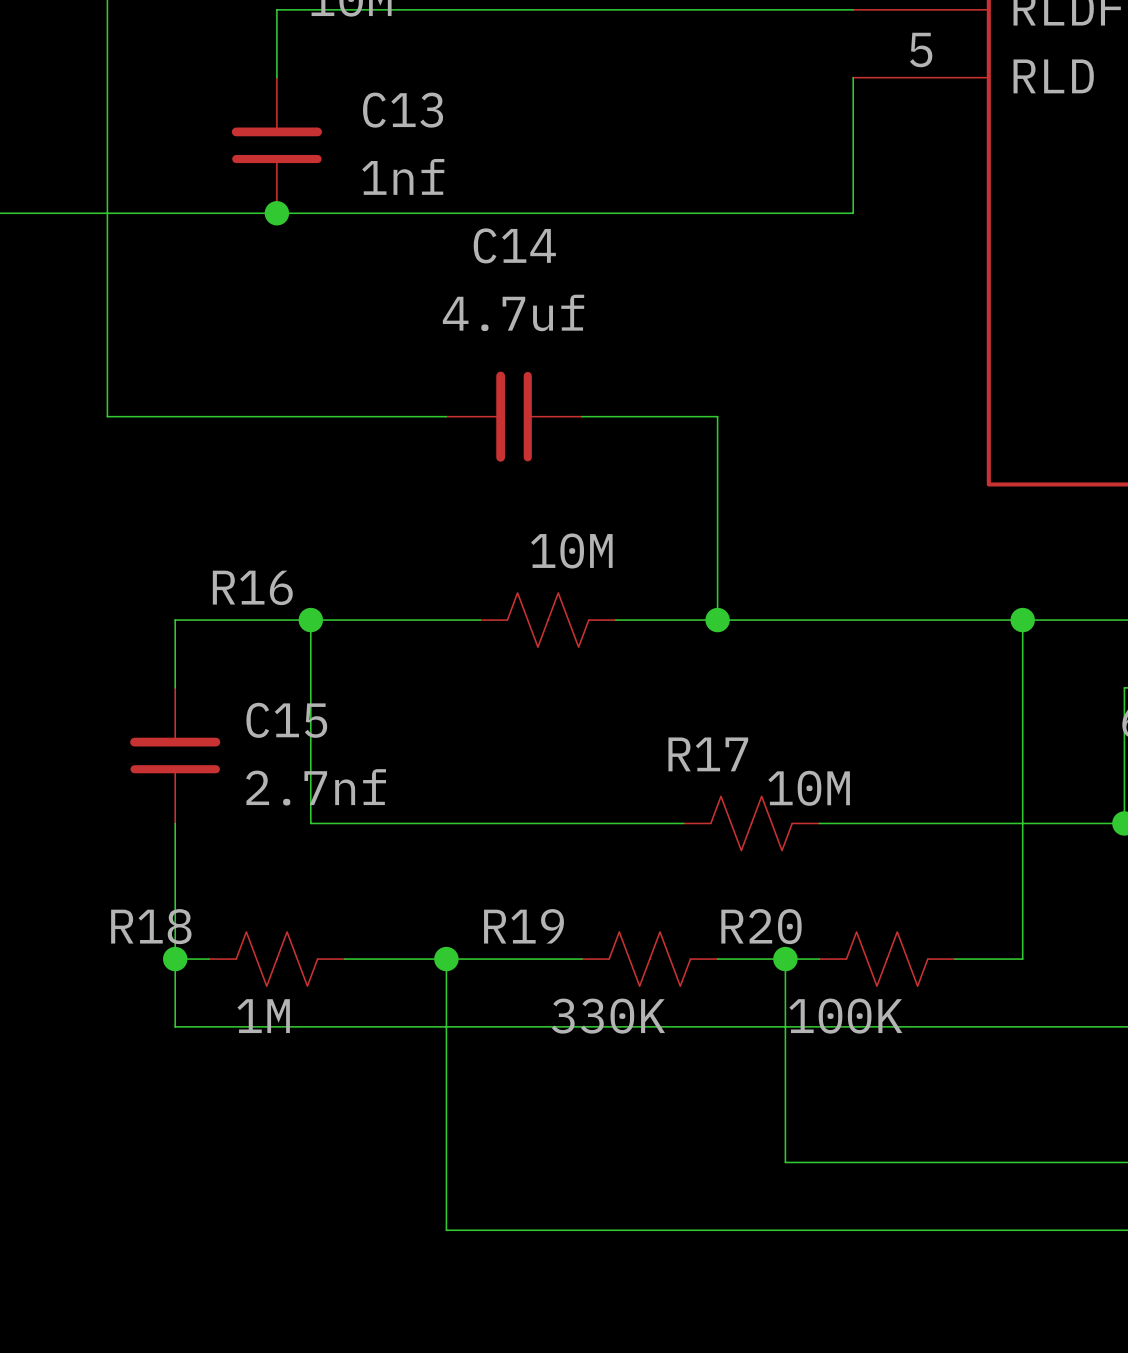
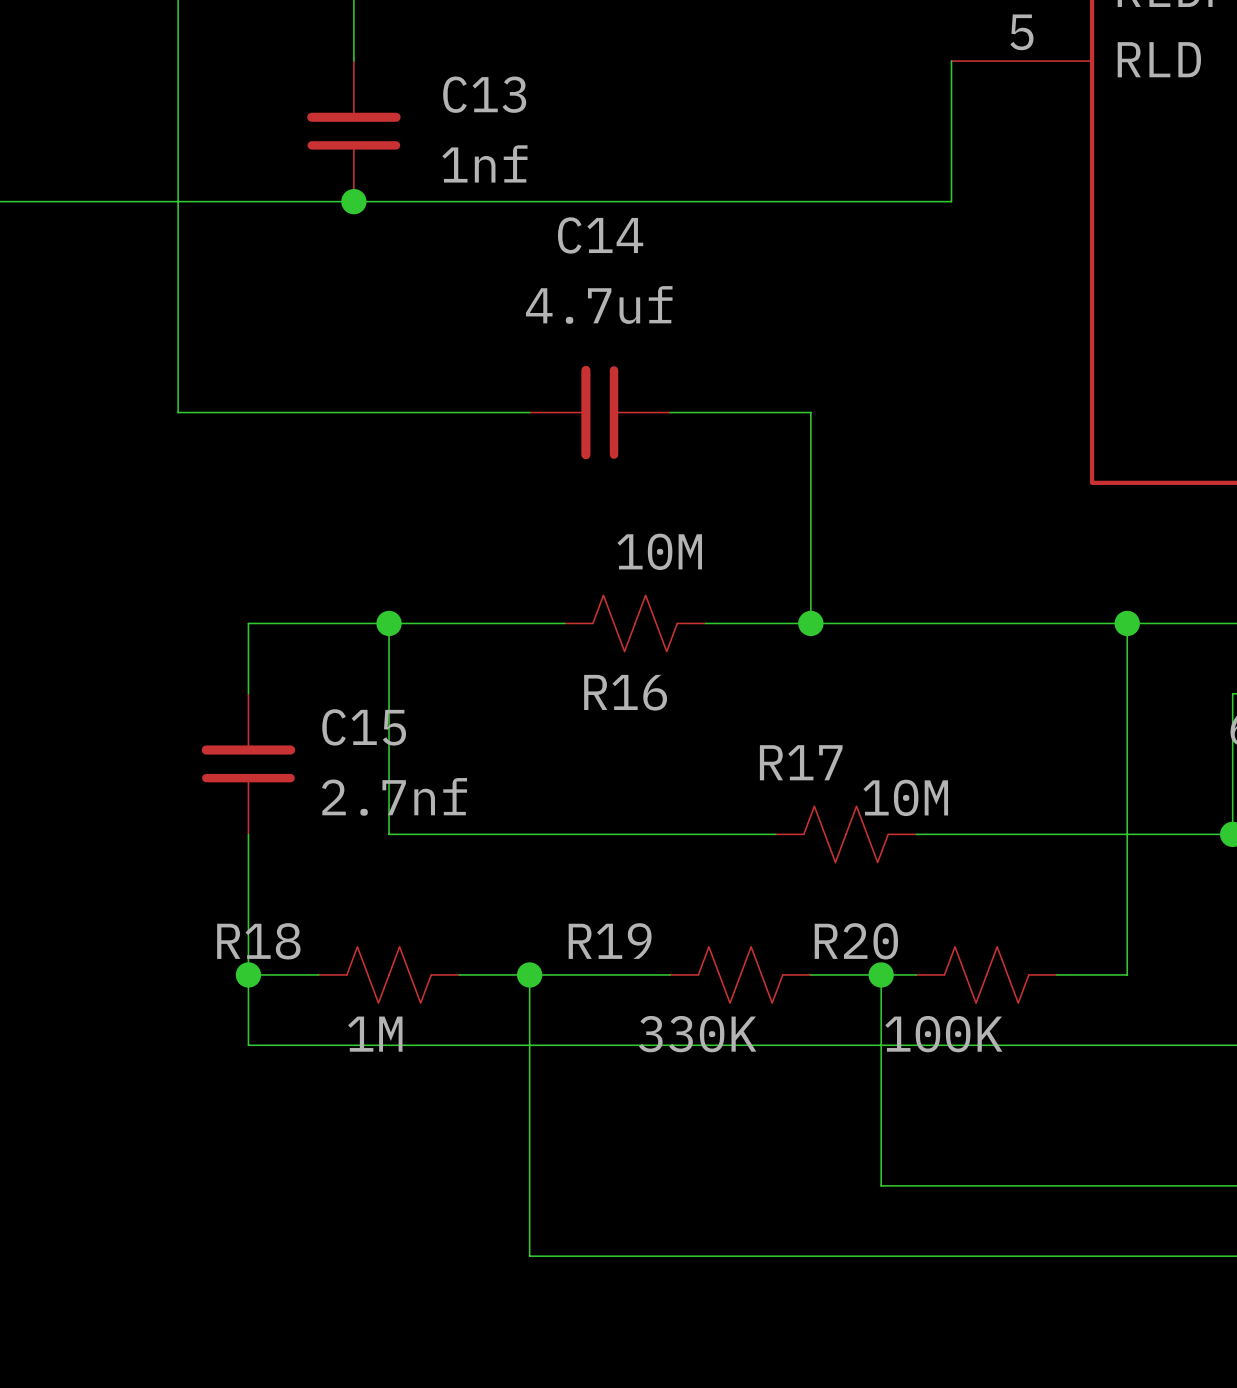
R16 name position: R16 (252, 587) -> R16 (625, 692)
R18 position: (276, 959) -> (389, 974)

